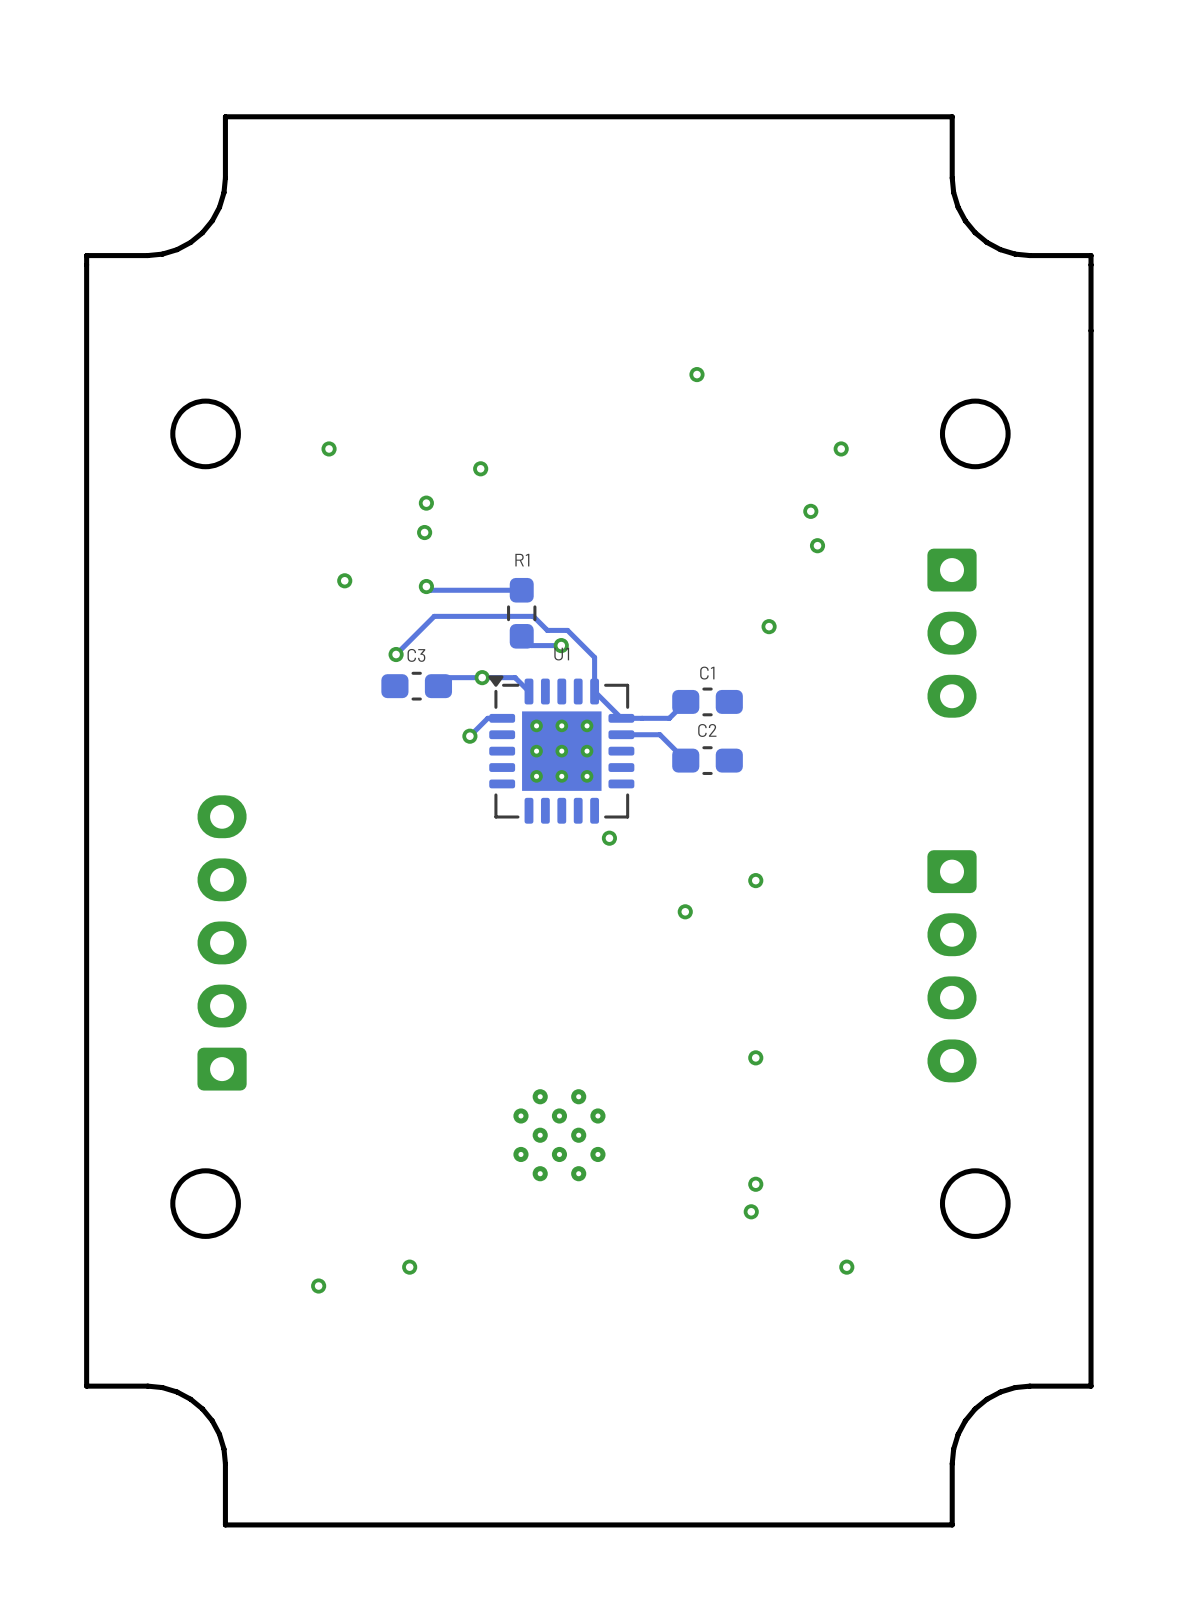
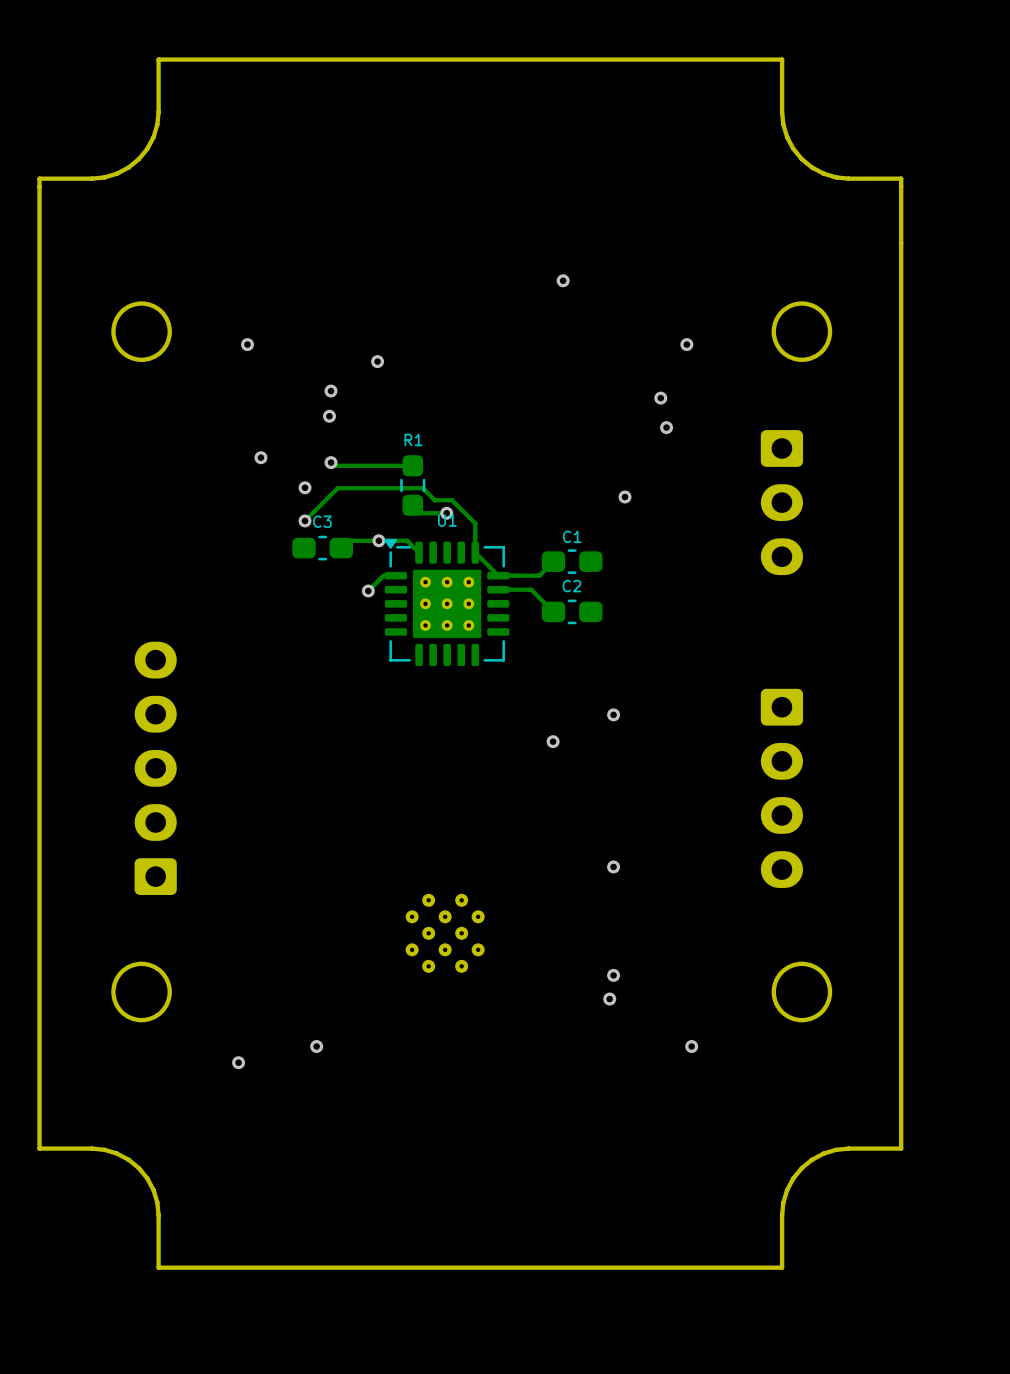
via: none -> (305, 487)
via: (609, 838) -> none

